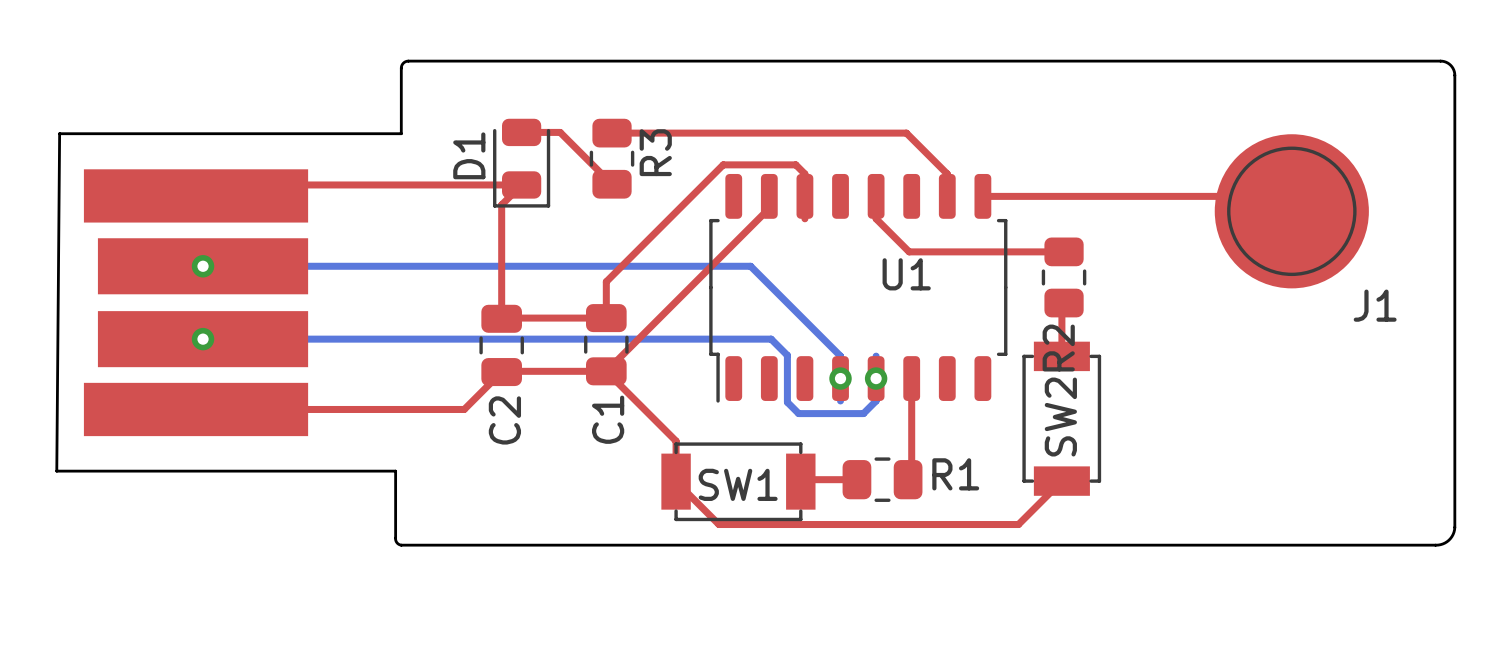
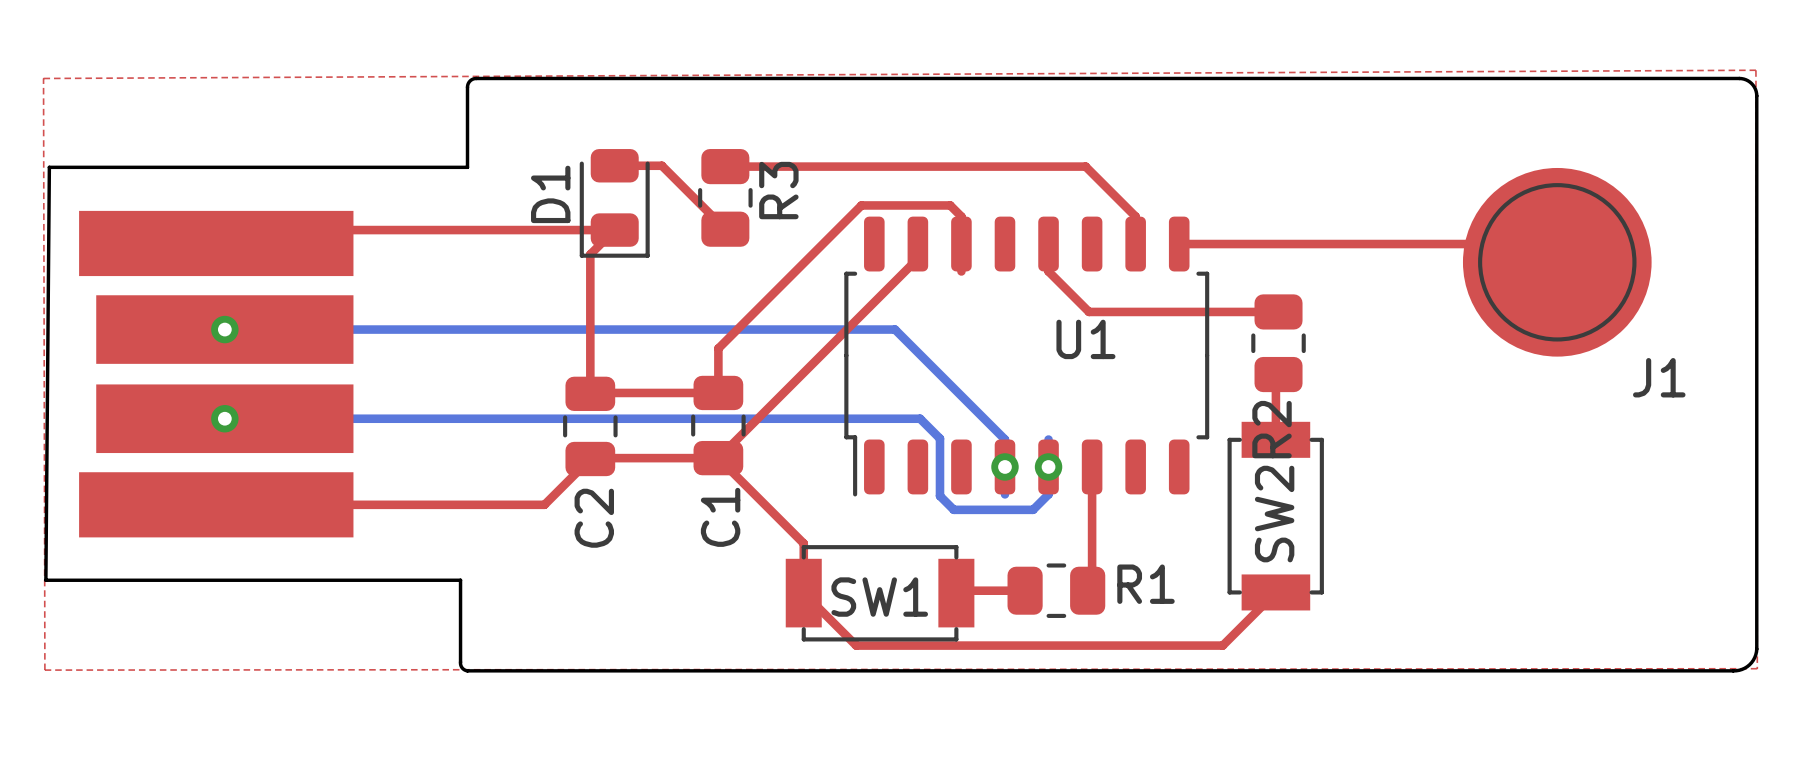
top zone outline: none -> (1755, 70) (43, 78) (44, 670) (1757, 668) (1755, 70)

